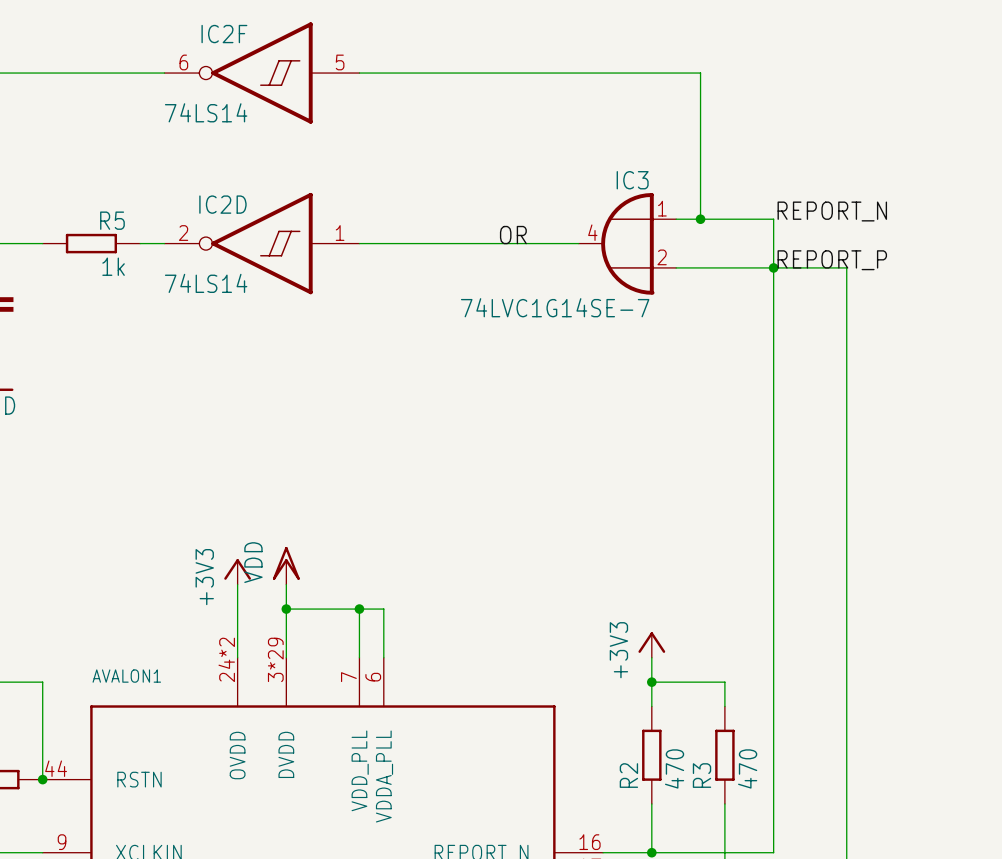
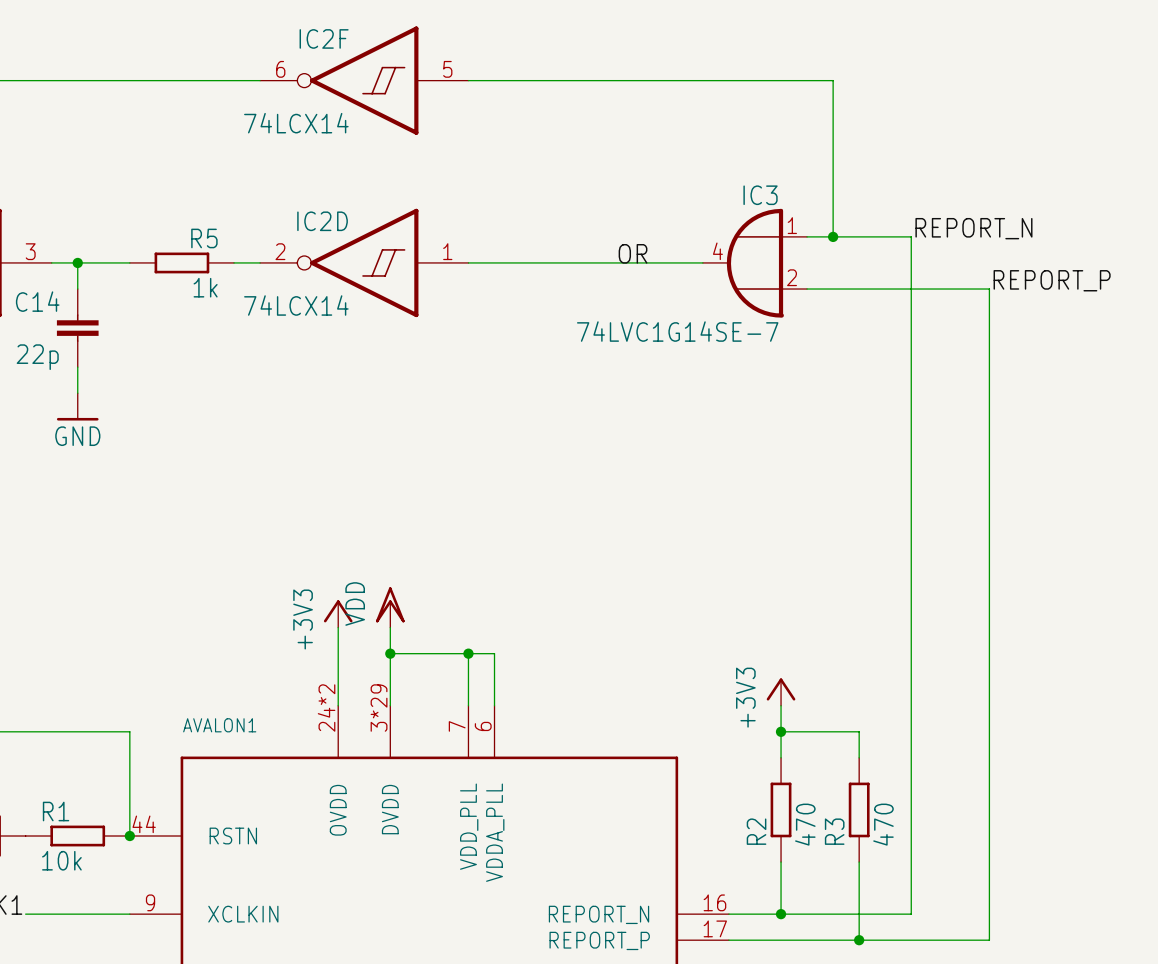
IC2F value: 74LS14 (206, 112) -> 74LCX14 (296, 123)
label position: REPORT_P (832, 260) -> REPORT_P (1052, 280)
junction: (773, 267) -> none
IC2D value: 74LS14 (206, 283) -> 74LCX14 (296, 305)

